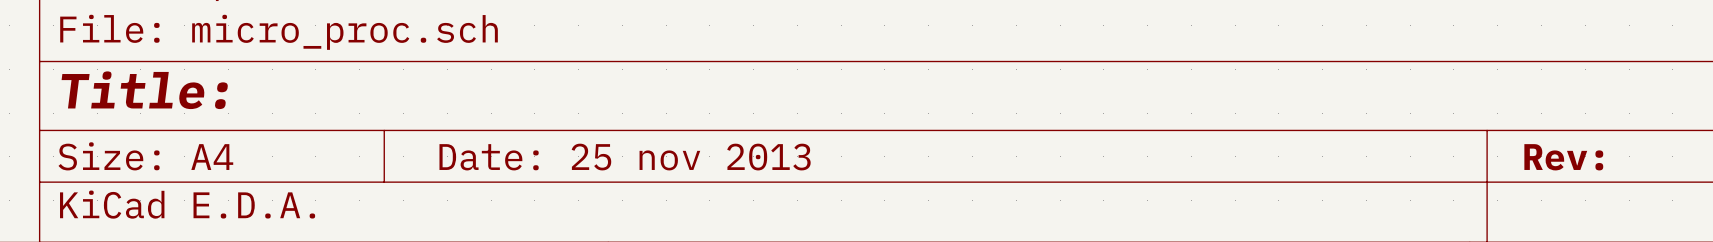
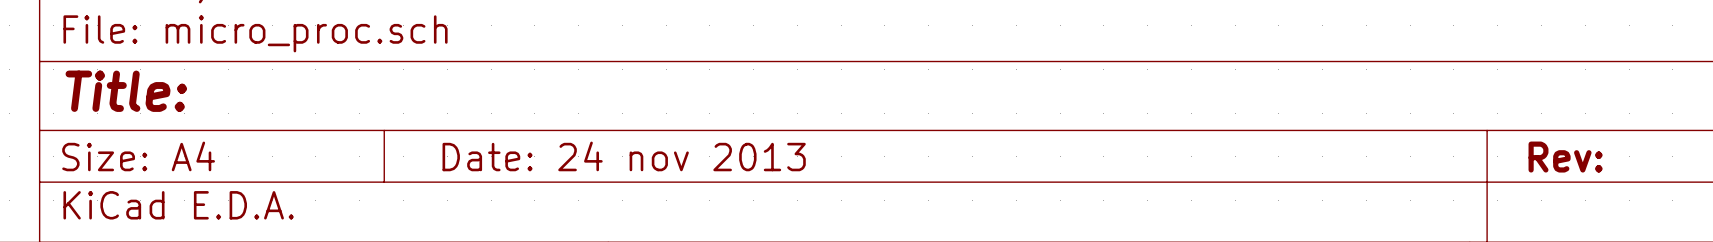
title block: Date: 25 nov 2013 (625, 157) -> Date: 24 nov 2013 (624, 156)

